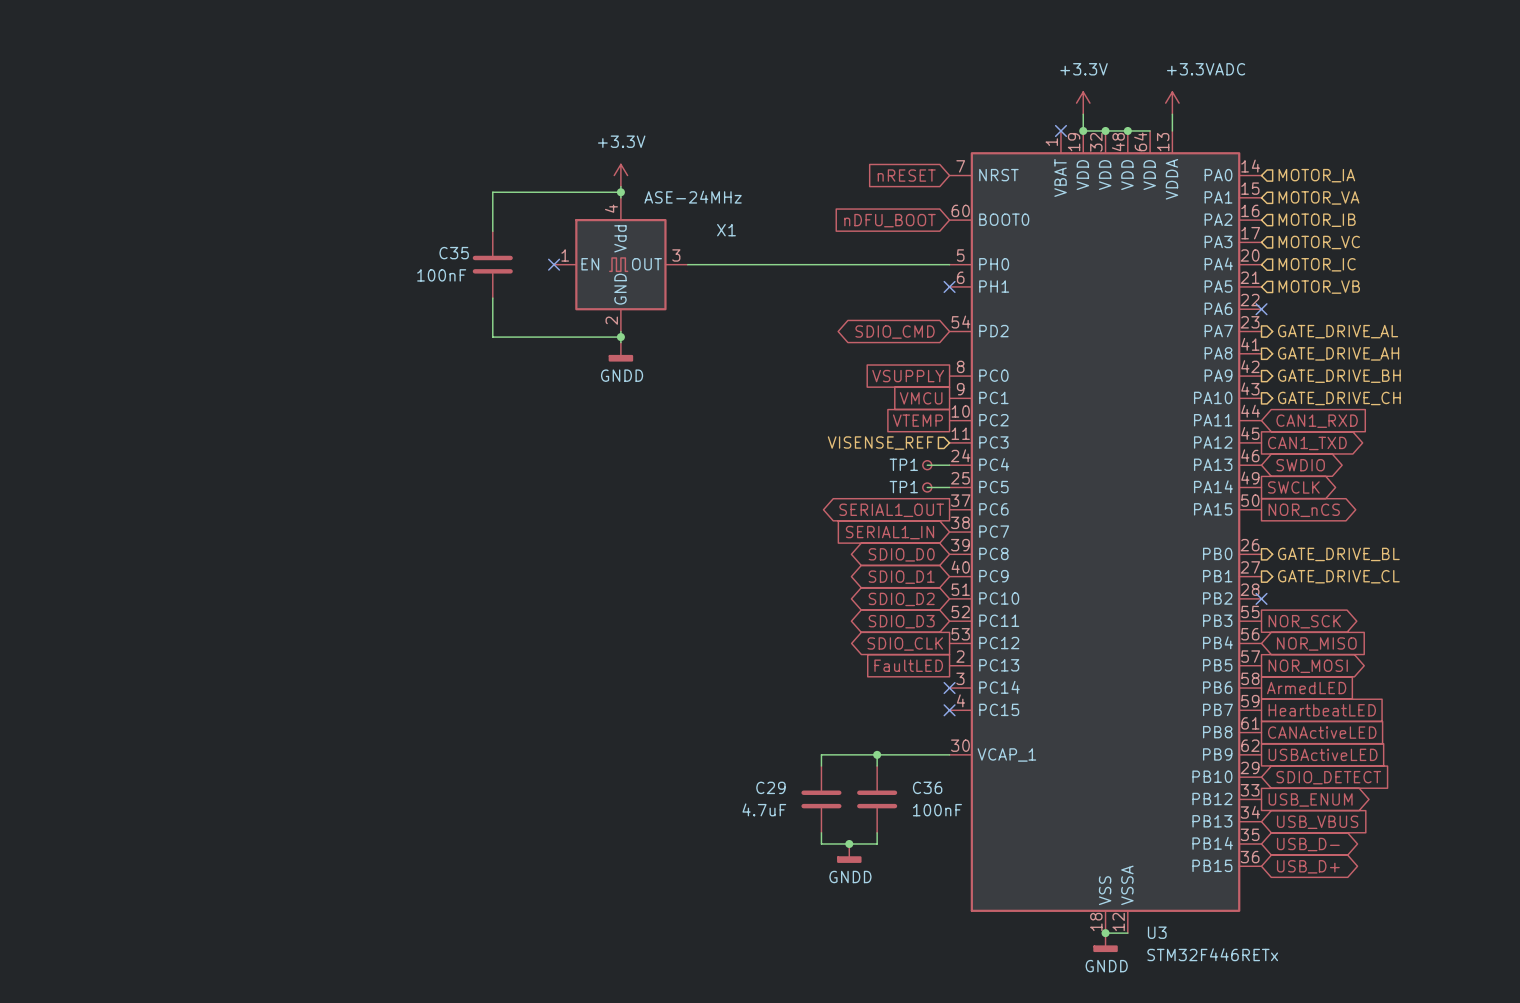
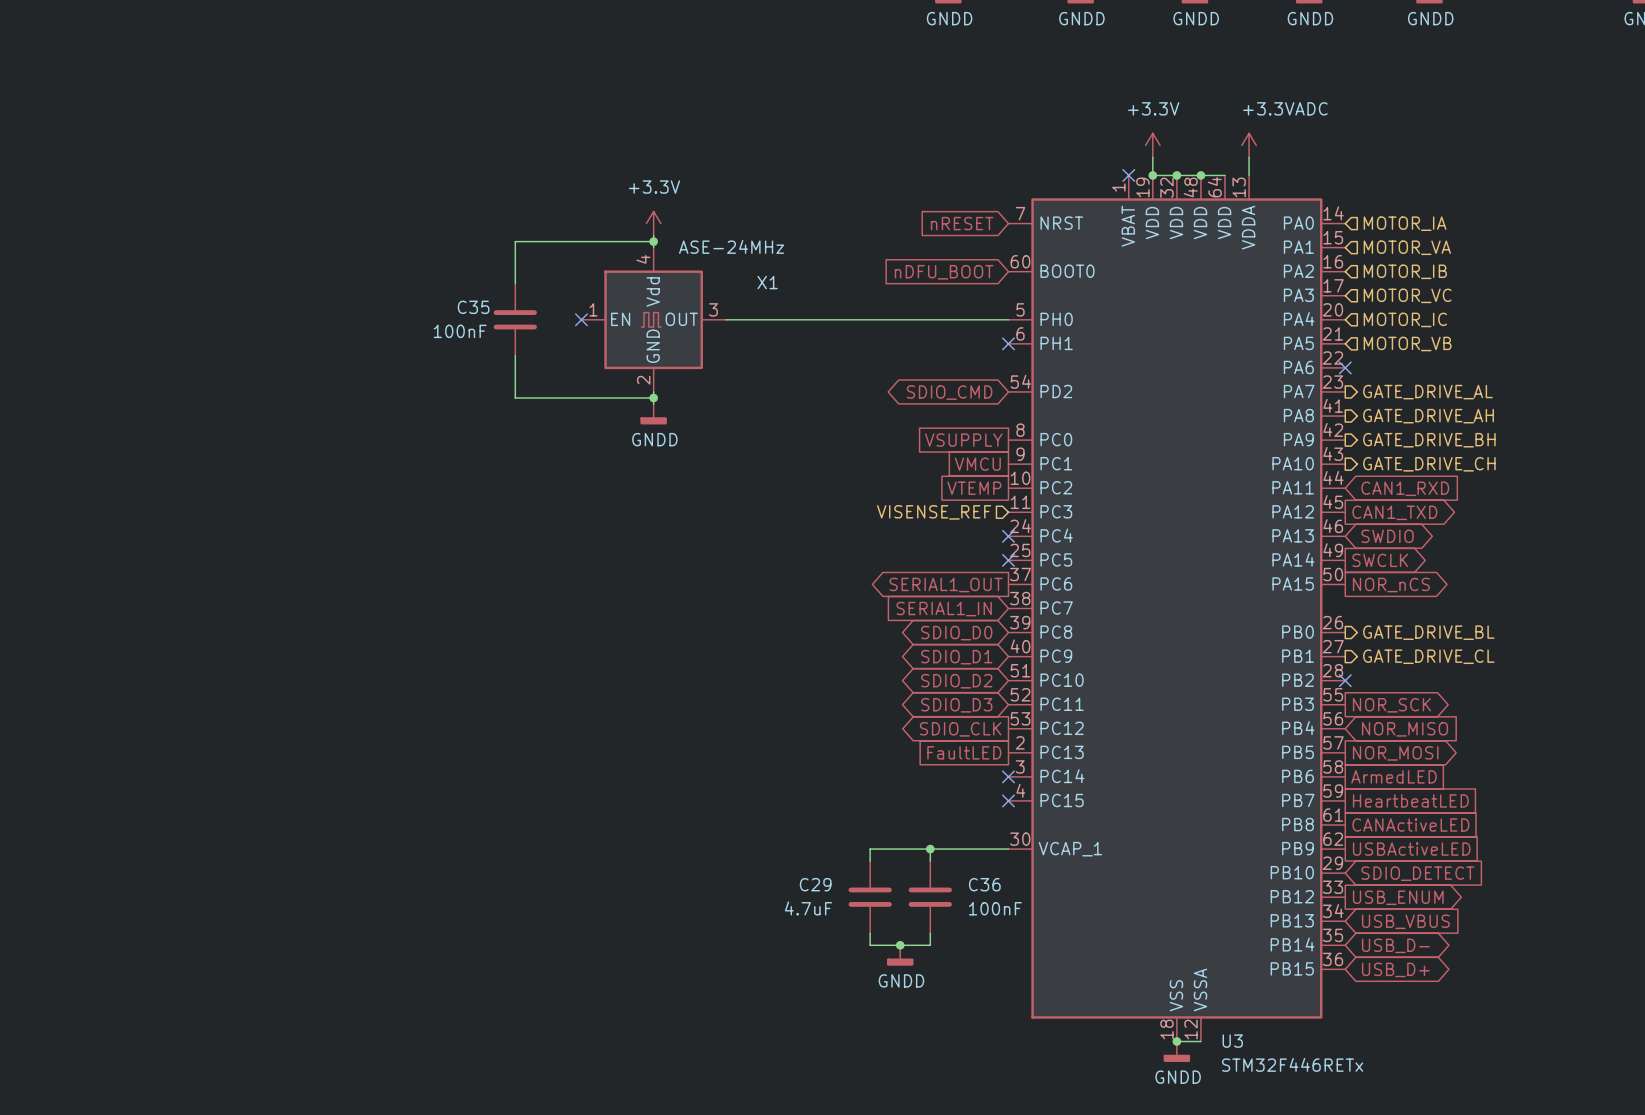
wire: (927, 465) (949, 465) -> none
TP1: (927, 465) -> none
no-connect mark: none -> (1008, 536)
wire: (927, 487) (949, 487) -> none
TP1: (927, 487) -> none
no-connect mark: none -> (1008, 560)

